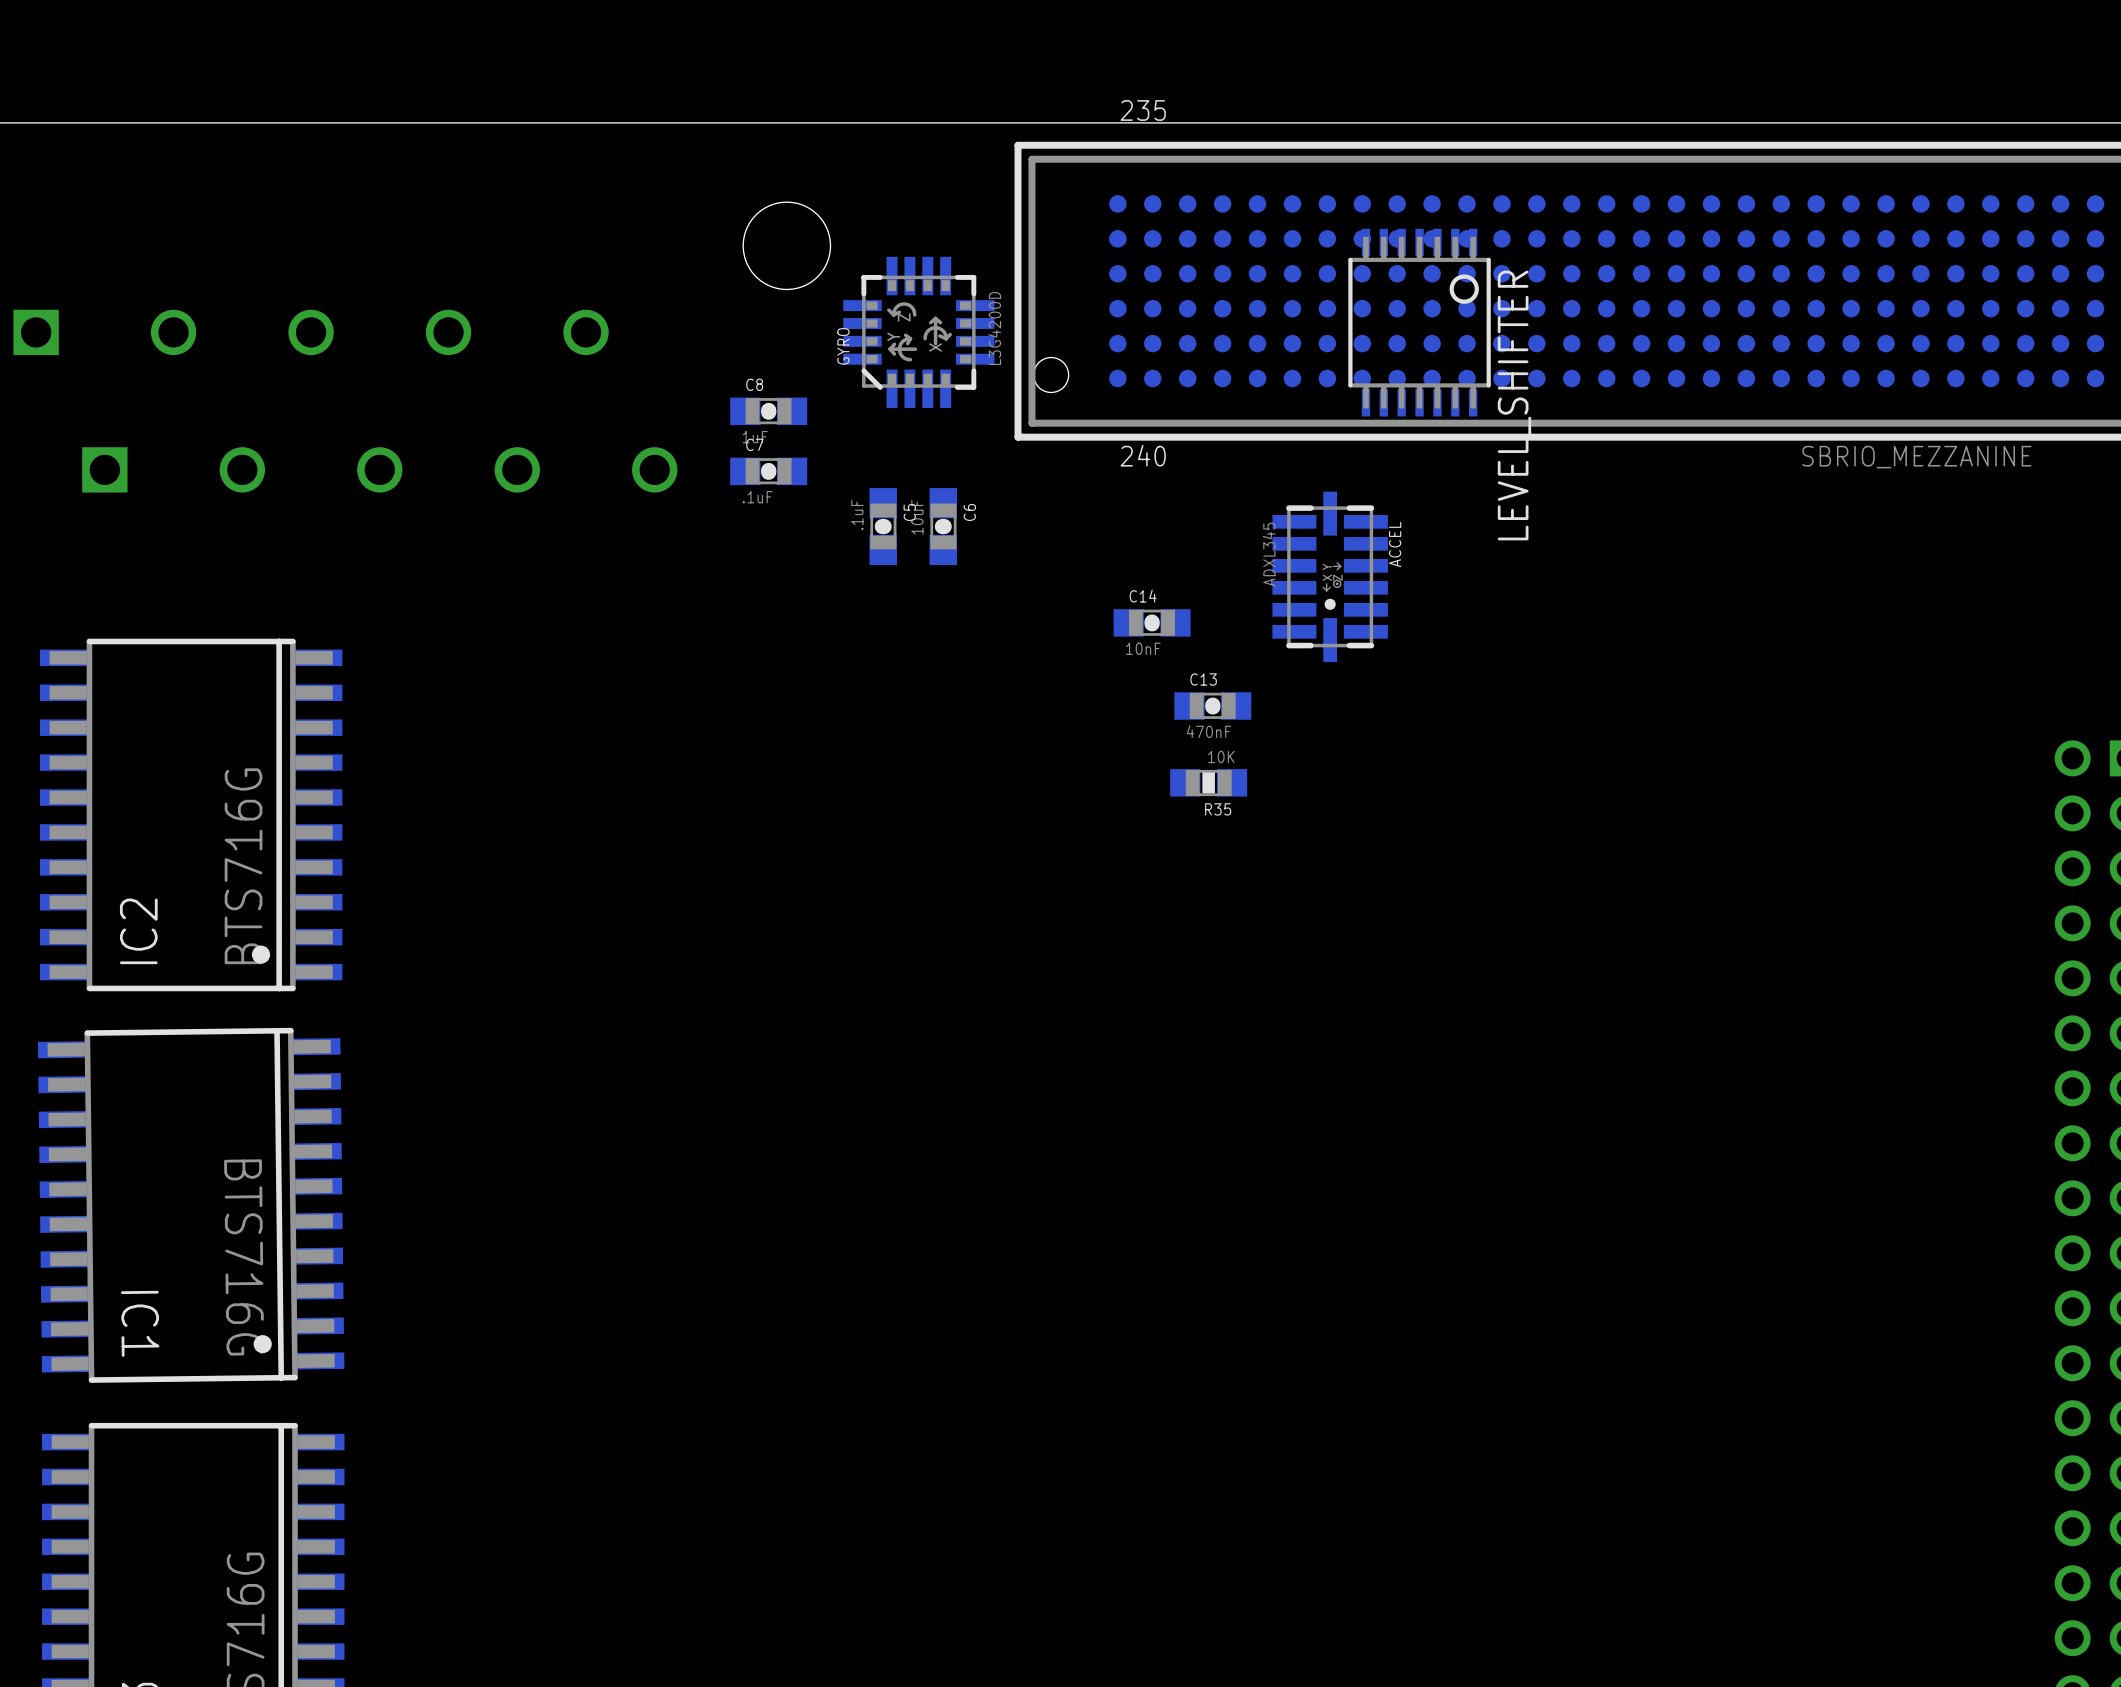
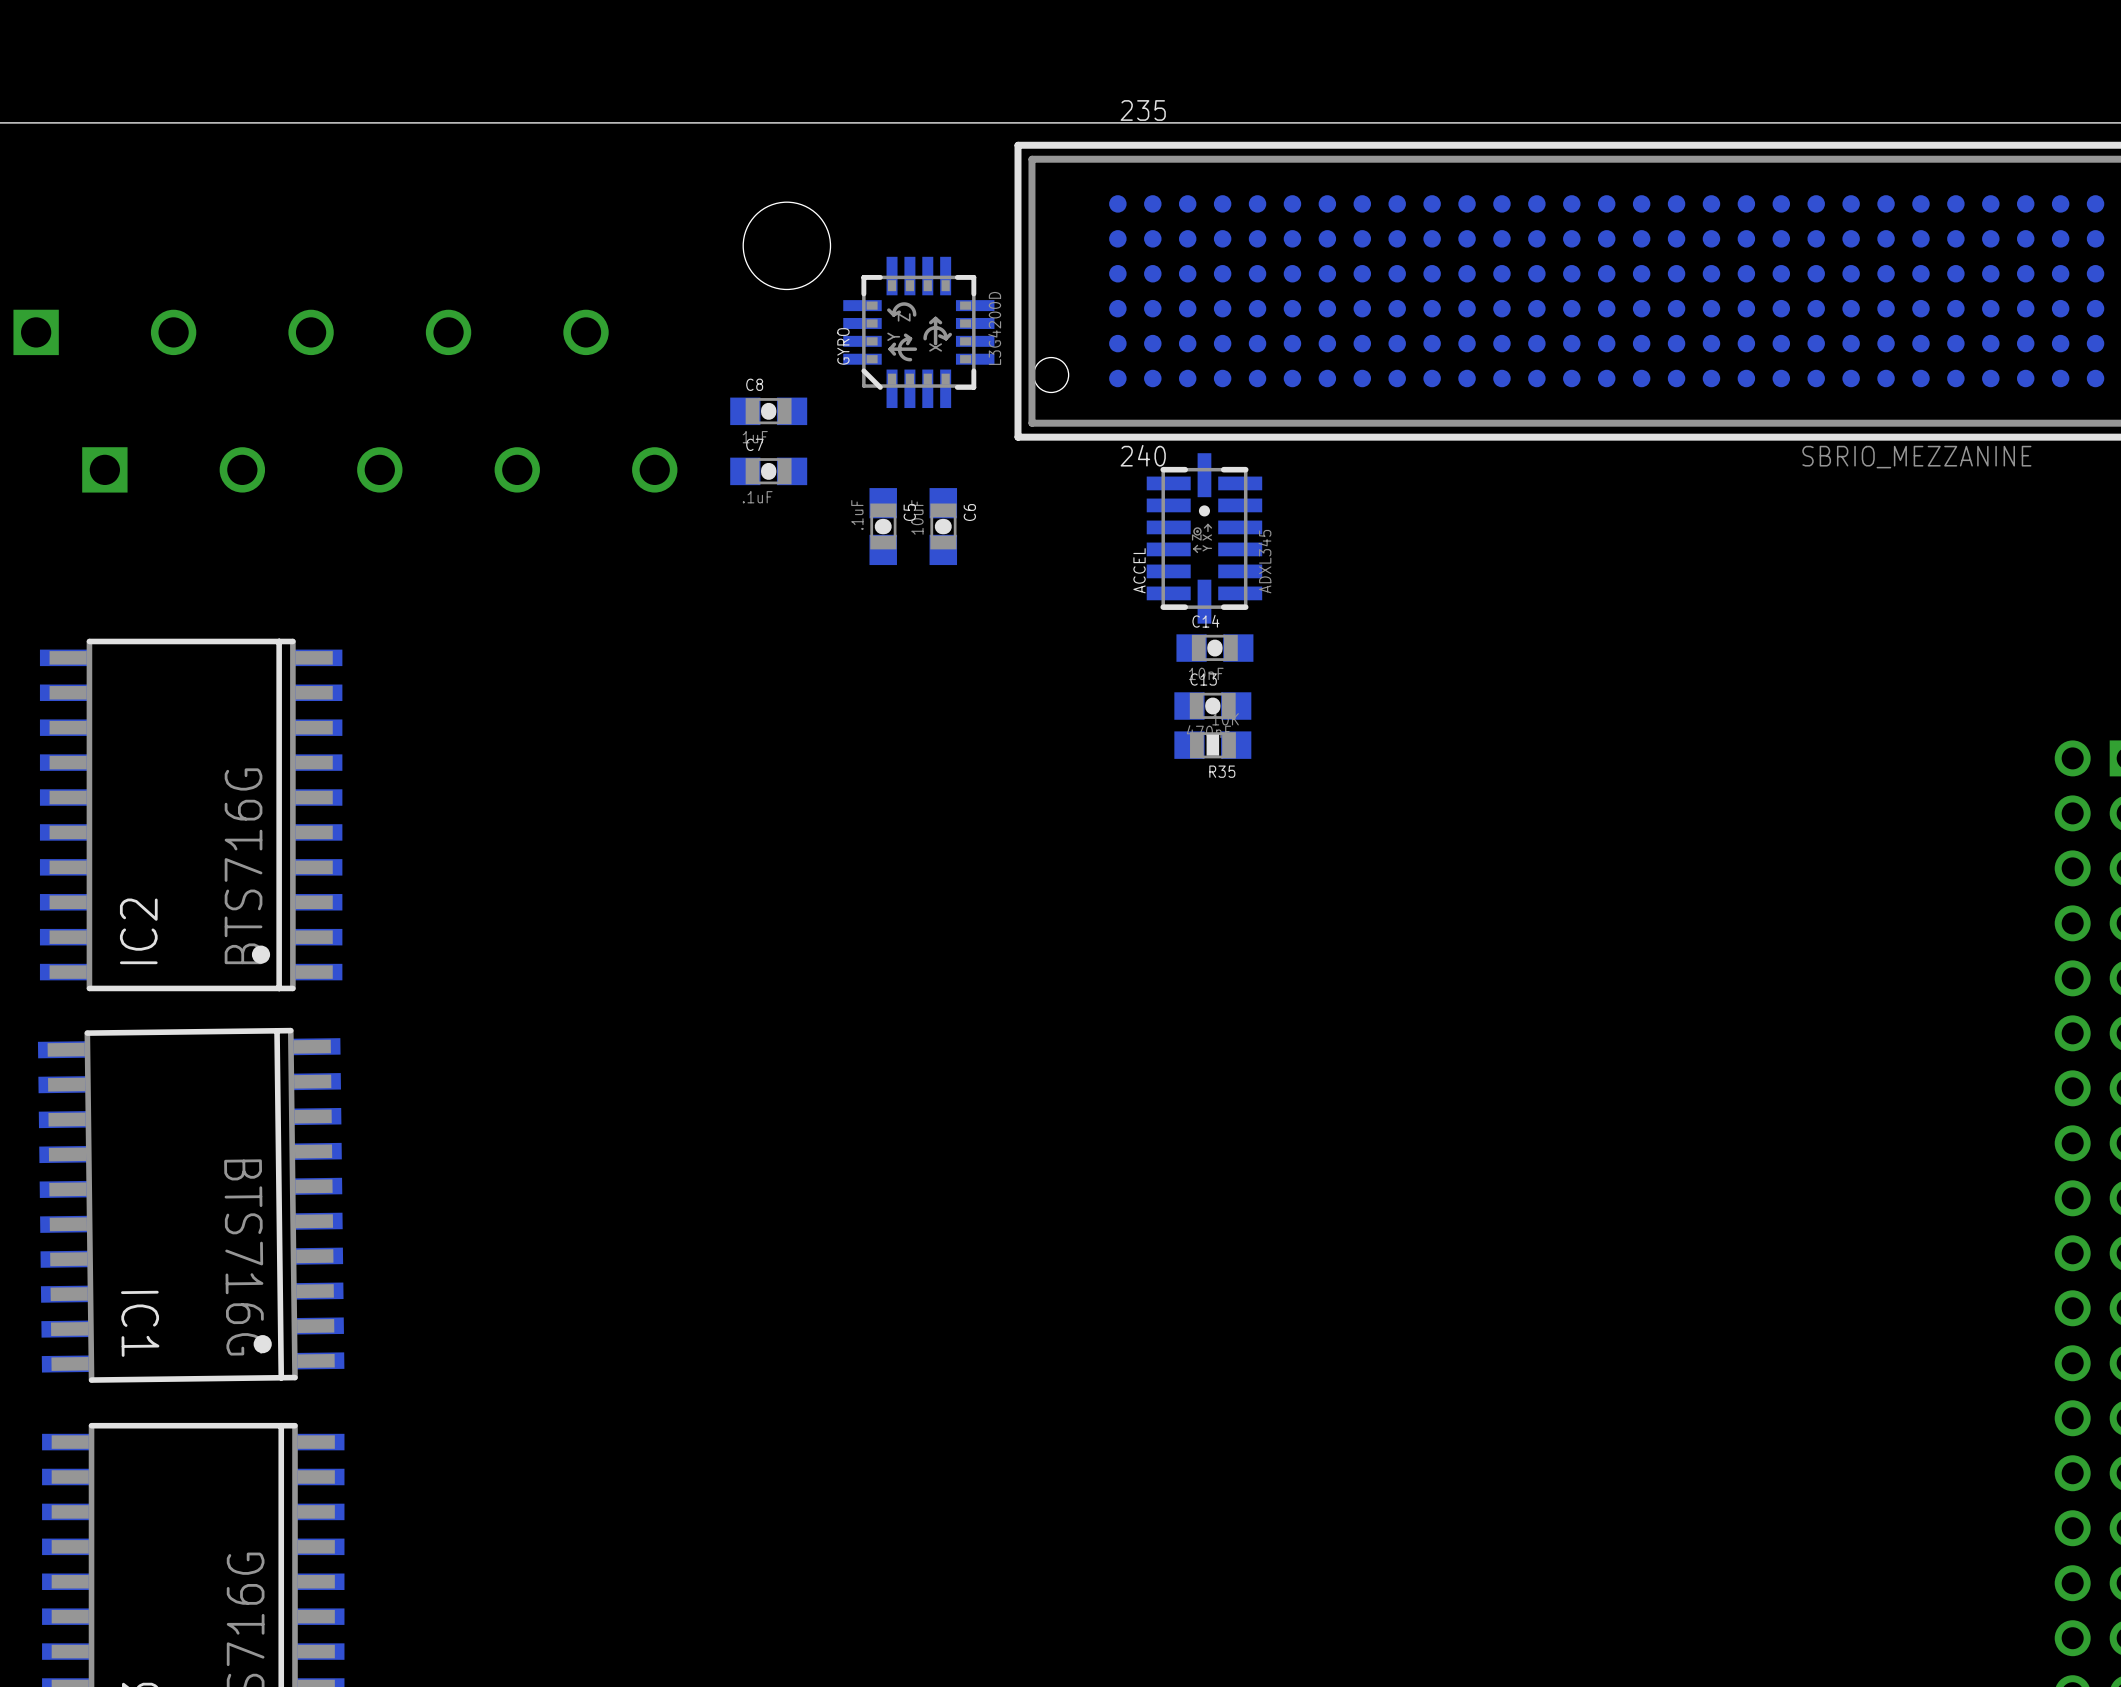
LEVEL_SHIFTER: (1419, 322) -> none
ACCEL: none -> ADXL345 (1204, 538)
ACCEL: ADXL345 (1330, 576) -> none
C14 position: (1152, 622) -> (1214, 648)
R35 position: (1208, 782) -> (1212, 745)

